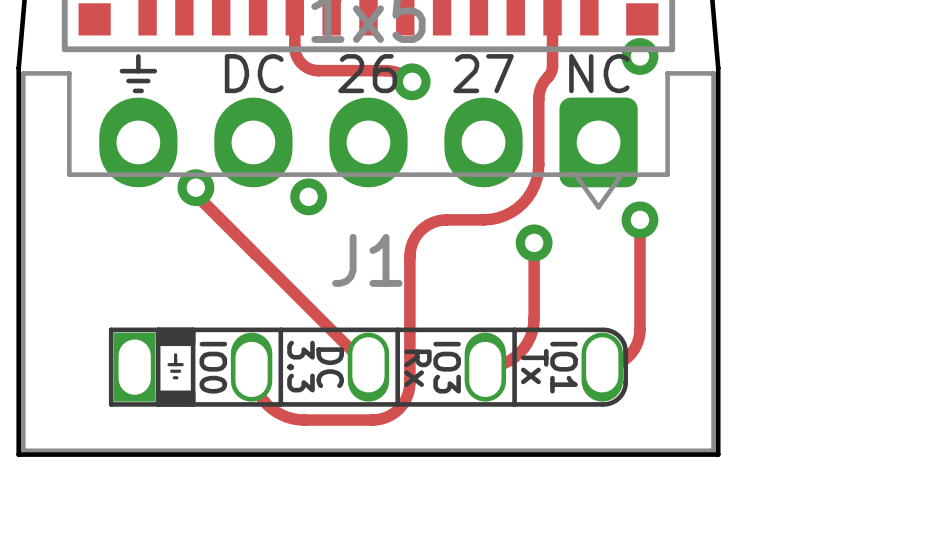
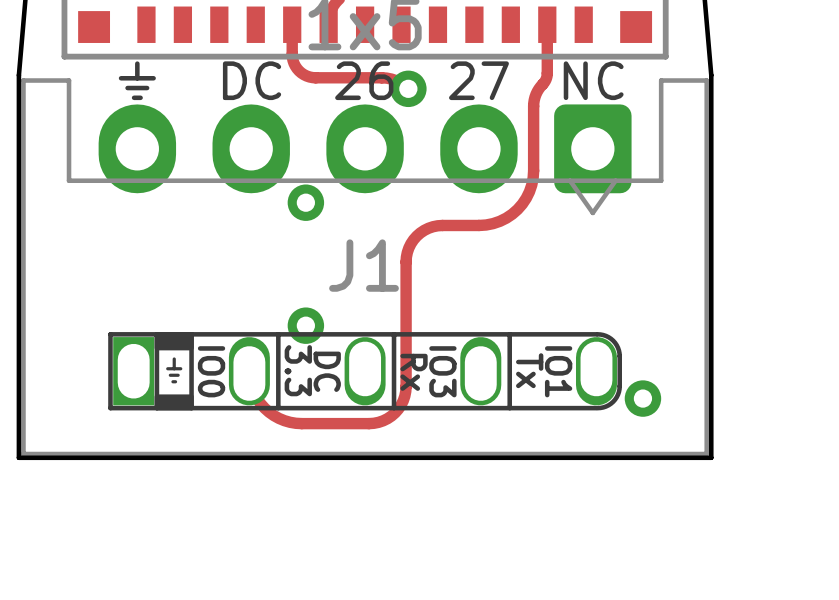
via: (639, 56) -> none
track: (195, 187) (200, 199) (368, 367) -> none
via: (195, 187) -> none
track: (639, 219) (639, 337) (634, 349) (625, 358) (614, 365) (602, 367) -> none
via: (639, 219) -> none
track: (534, 242) (534, 318) (530, 337) (524, 348) (515, 357) (504, 363) (485, 367) -> none
via: (534, 242) -> none
via: none -> (305, 325)
via: none -> (642, 398)

